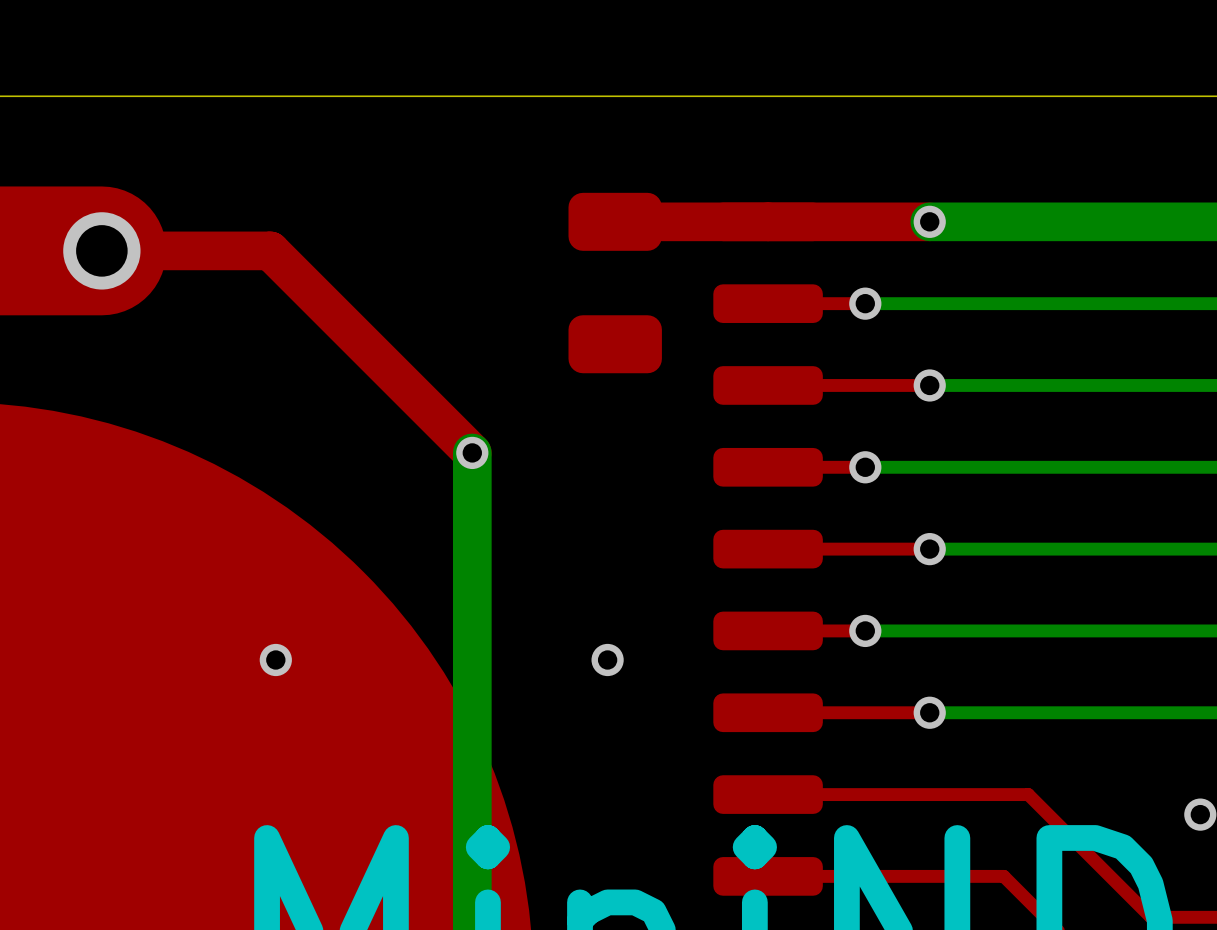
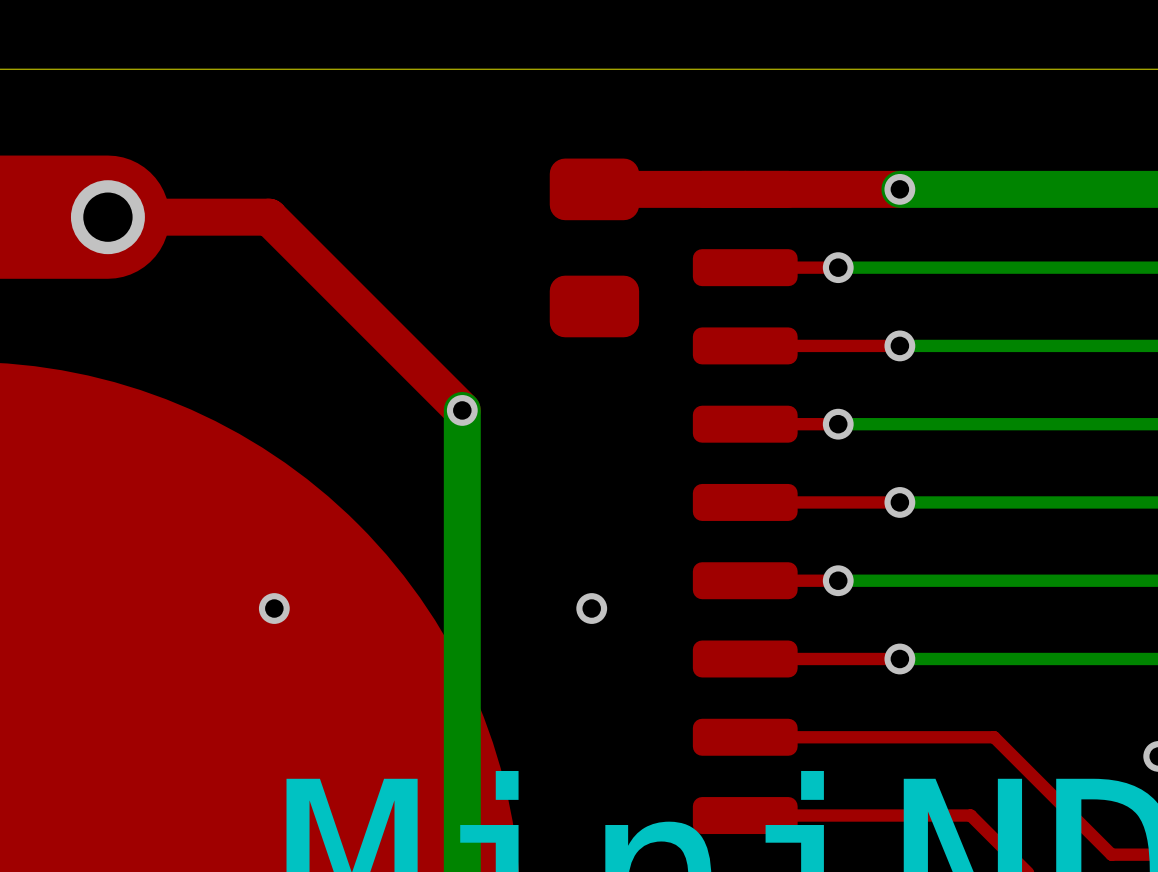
part footprint: [568, 192, 662, 374] -> [549, 158, 640, 338]

